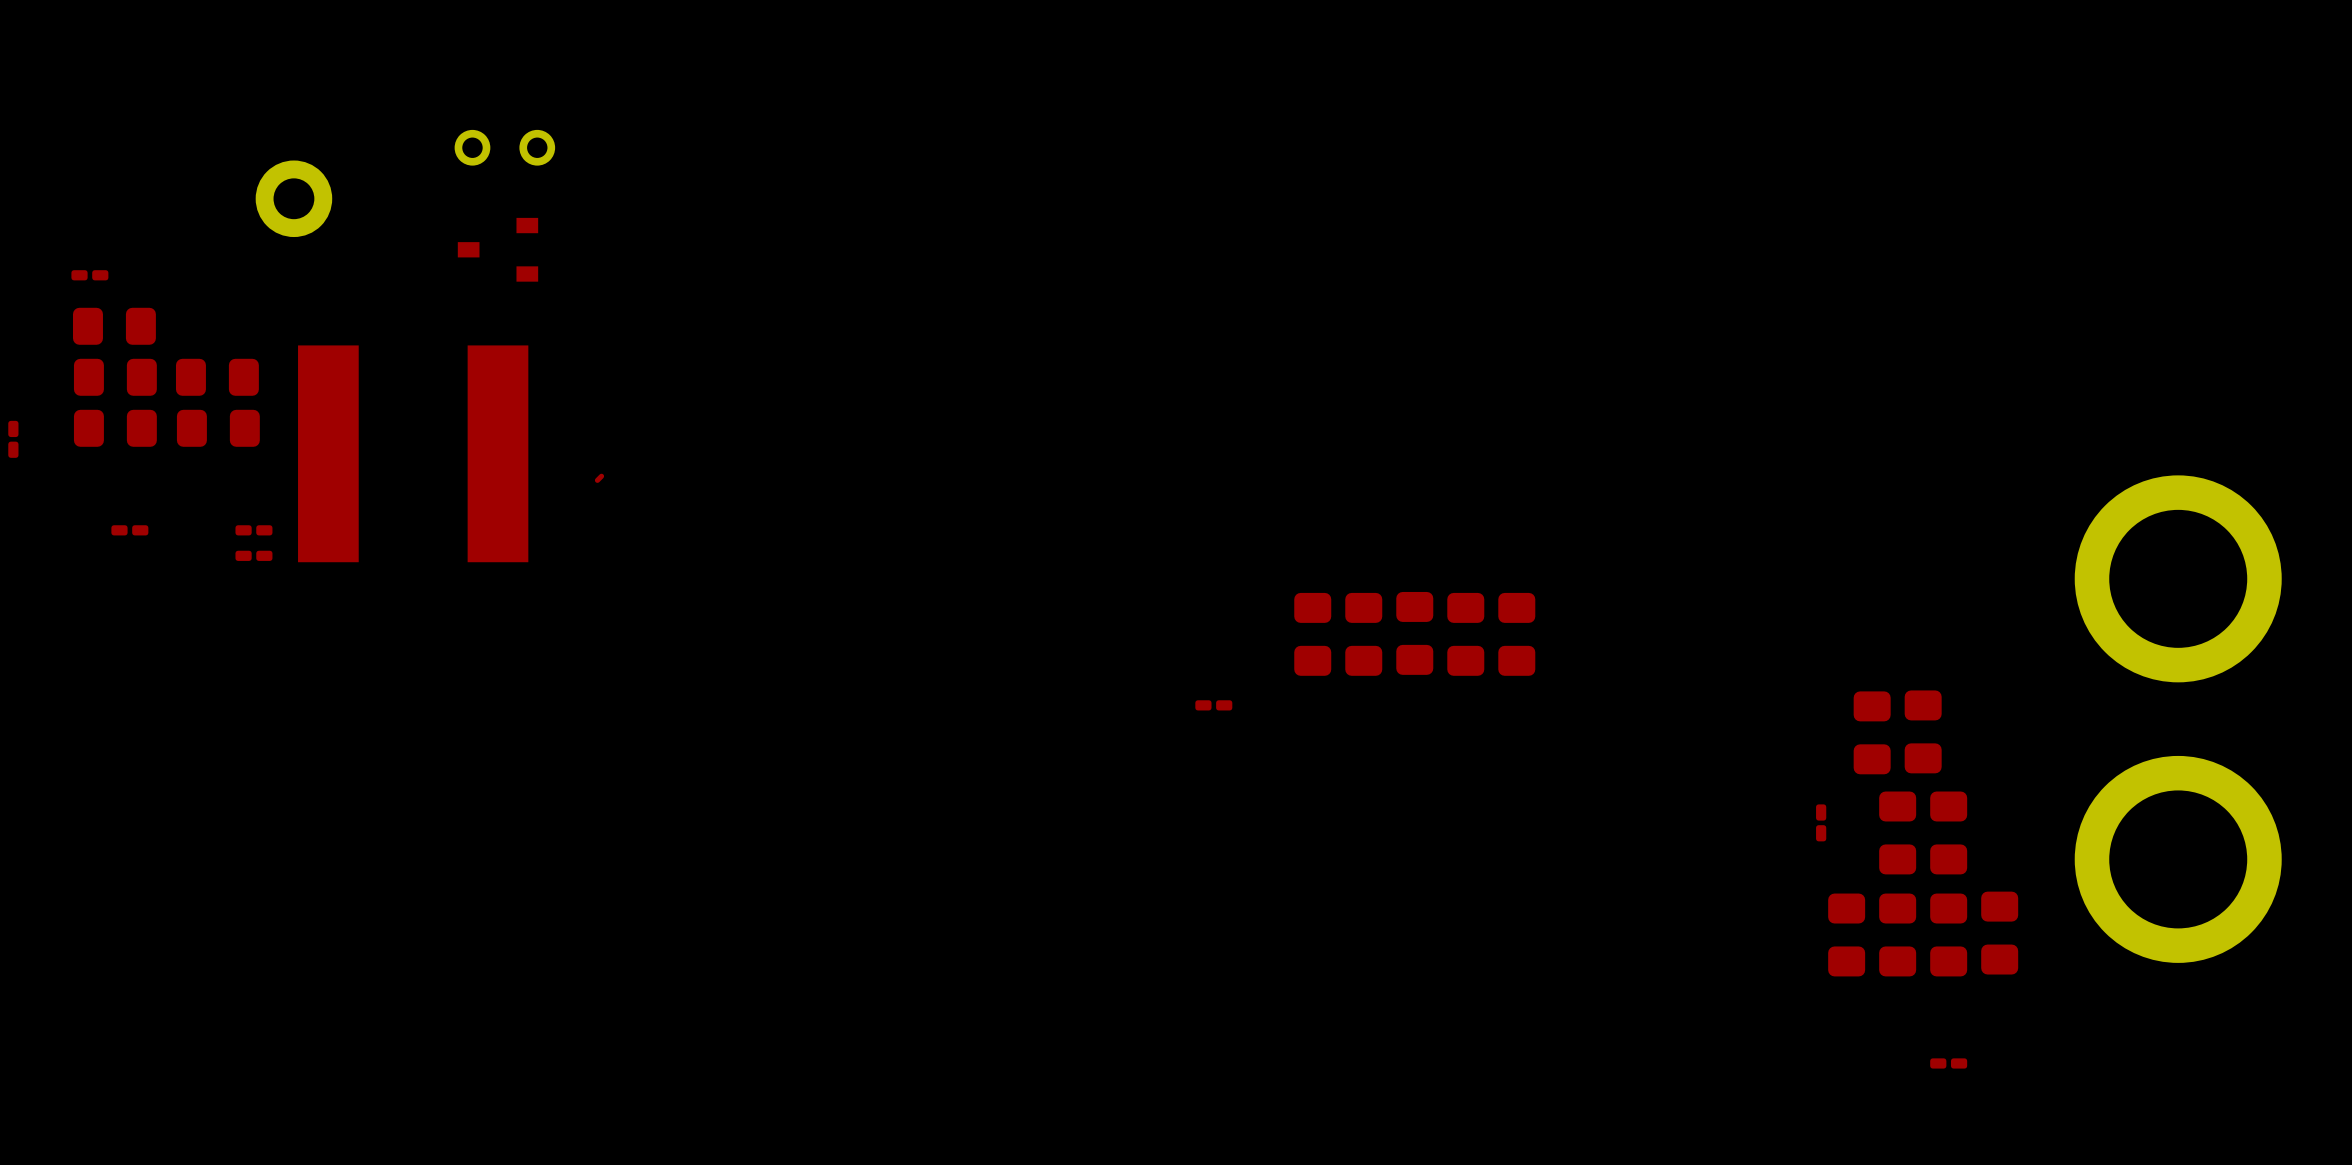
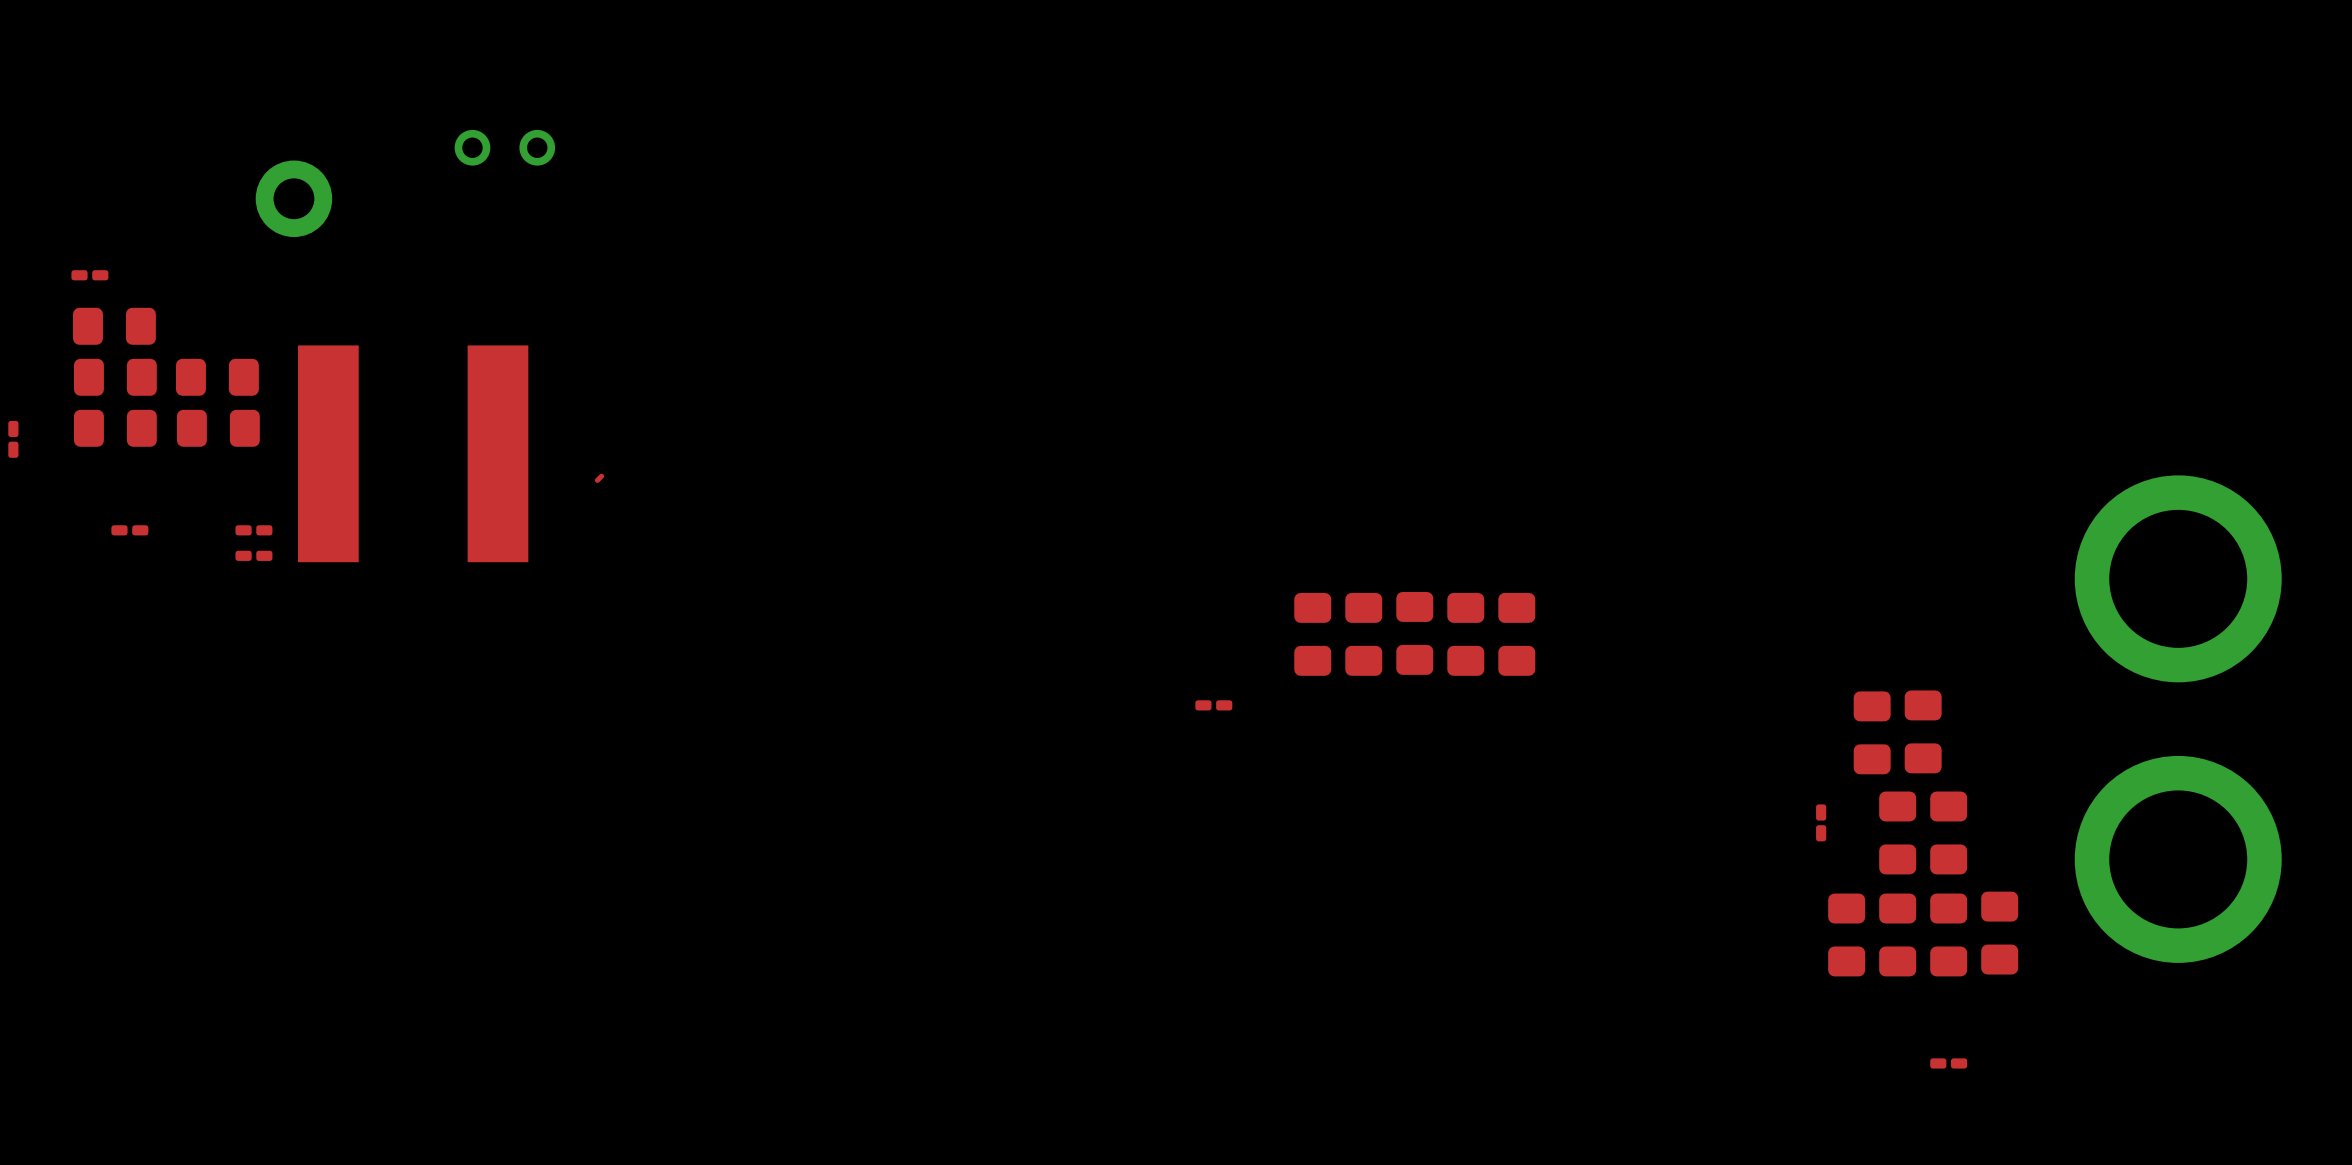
part: (497, 249) -> none

